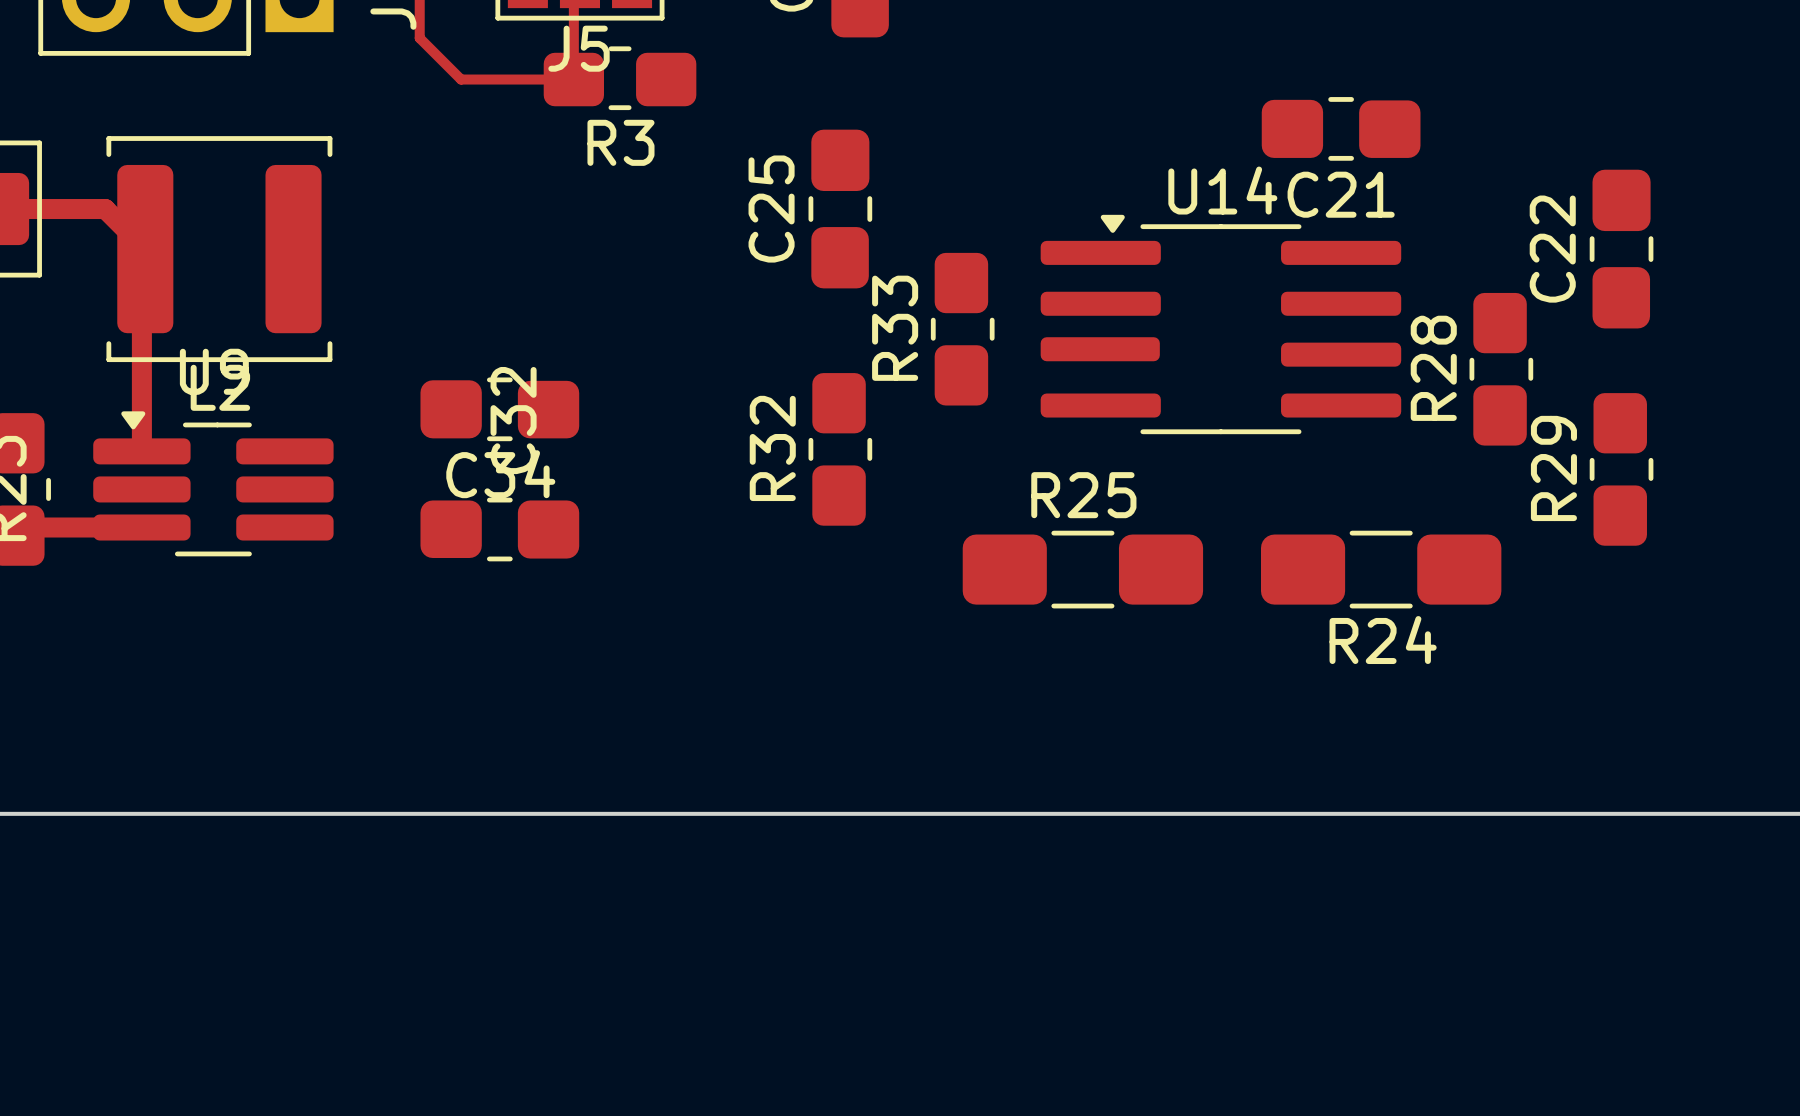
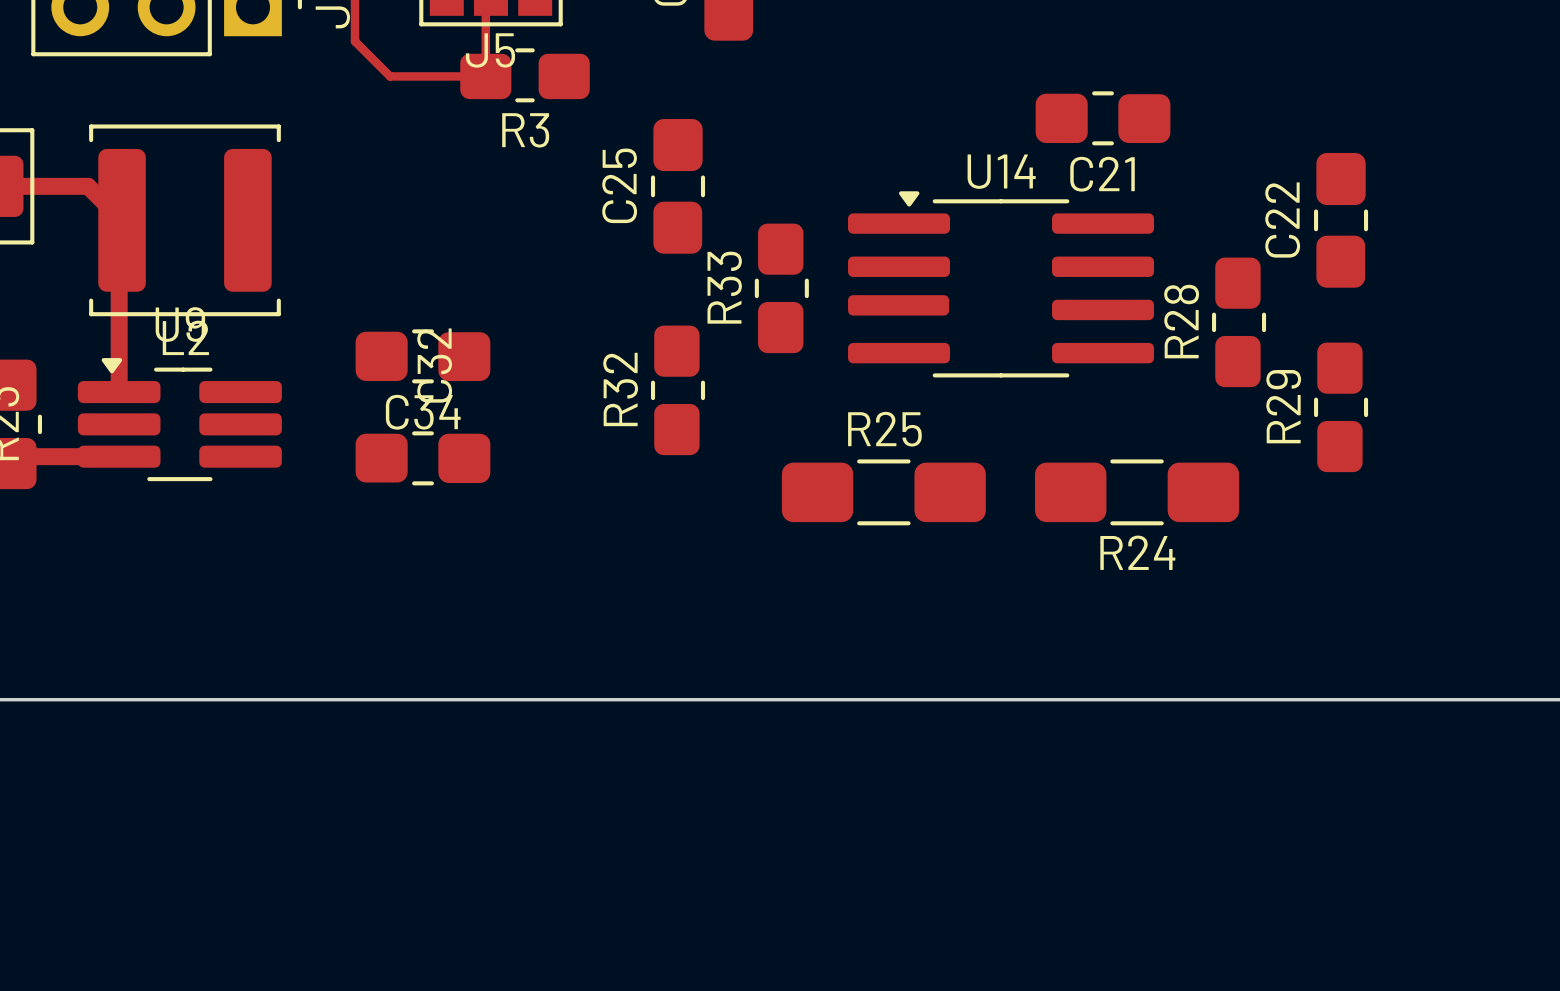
C21 position: (1341, 128) -> (1103, 118)
C25 position: (840, 209) -> (678, 186)
C22 position: (1621, 249) -> (1341, 220)
U14 position: (1220, 324) -> (1001, 284)
R33 position: (962, 329) -> (781, 288)
R28 position: (1501, 369) -> (1239, 322)
R32 position: (840, 449) -> (678, 390)
R29 position: (1621, 469) -> (1341, 407)
R25 position: (1082, 569) -> (883, 492)
R24 position: (1381, 569) -> (1137, 492)

